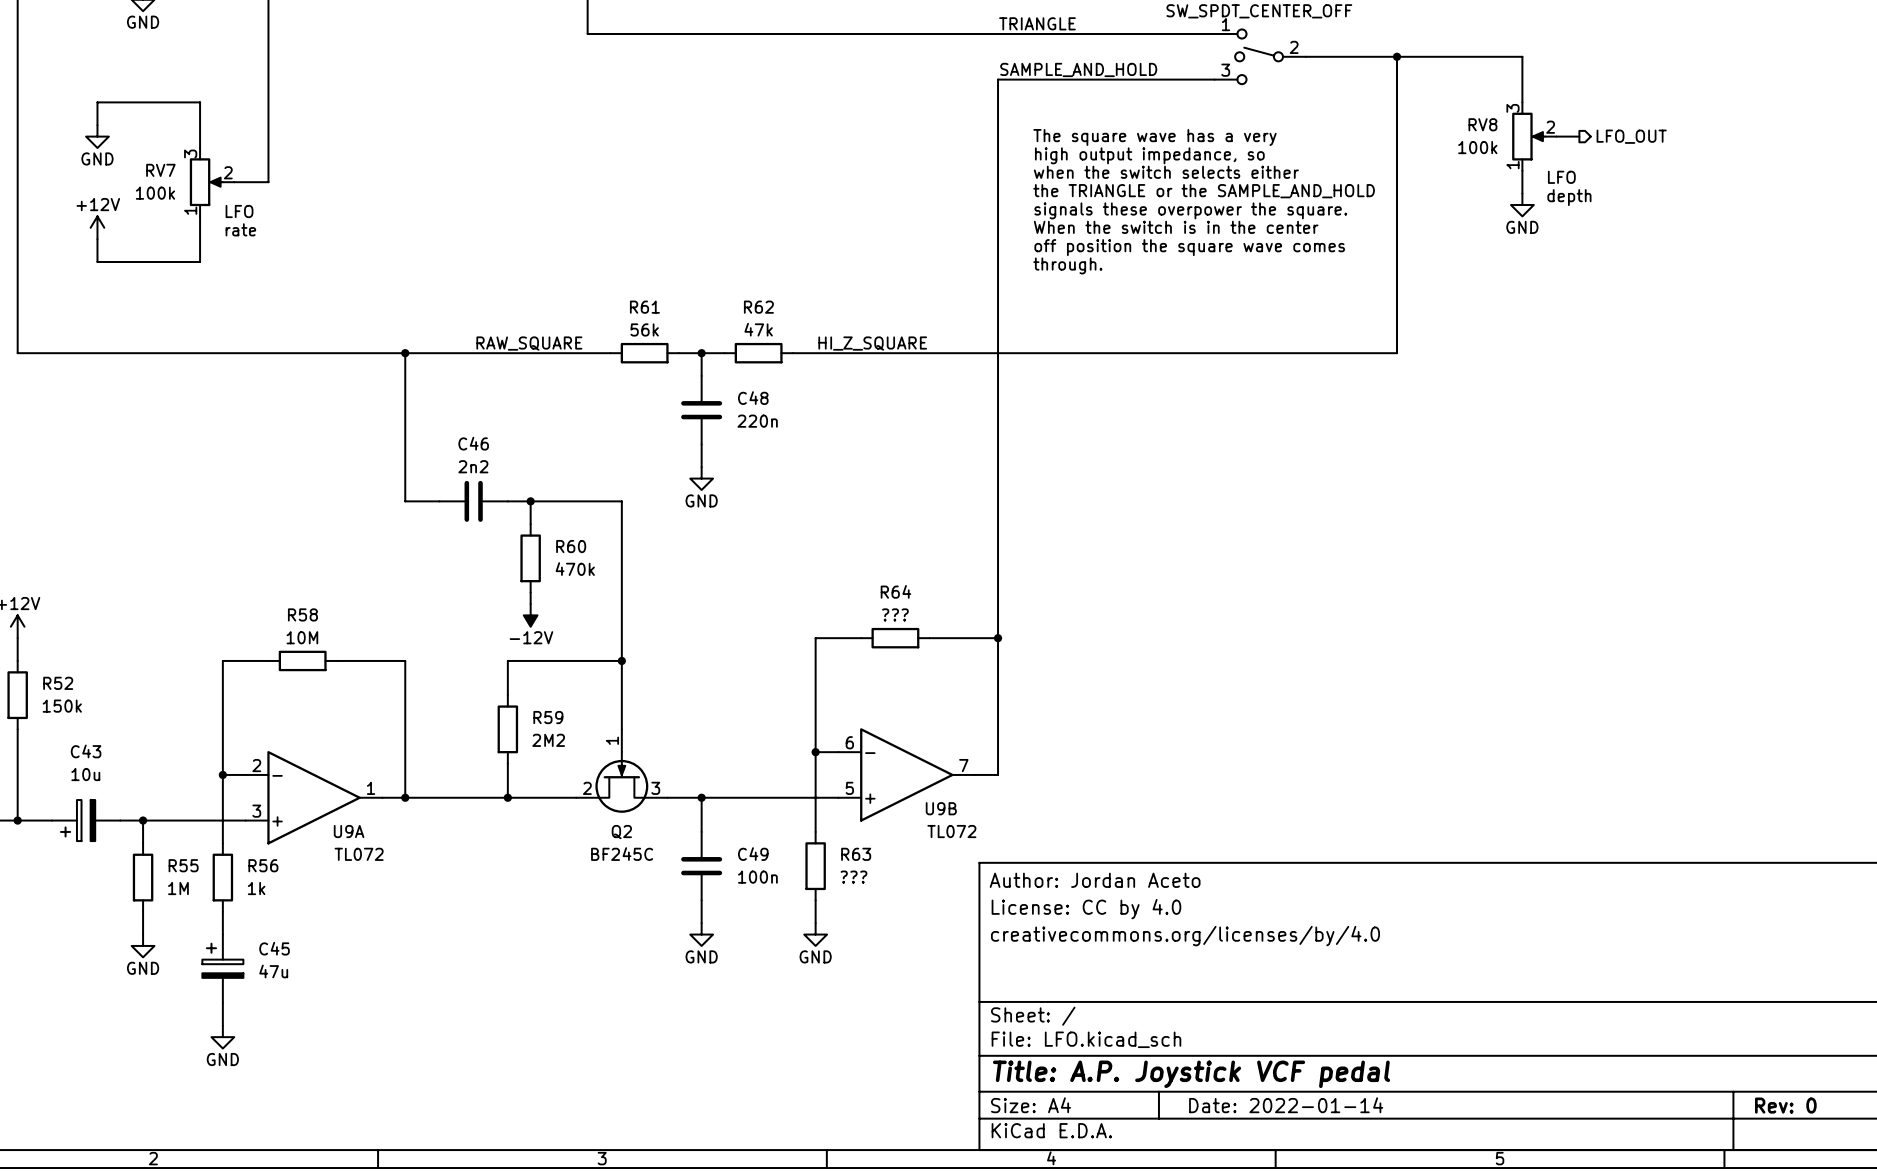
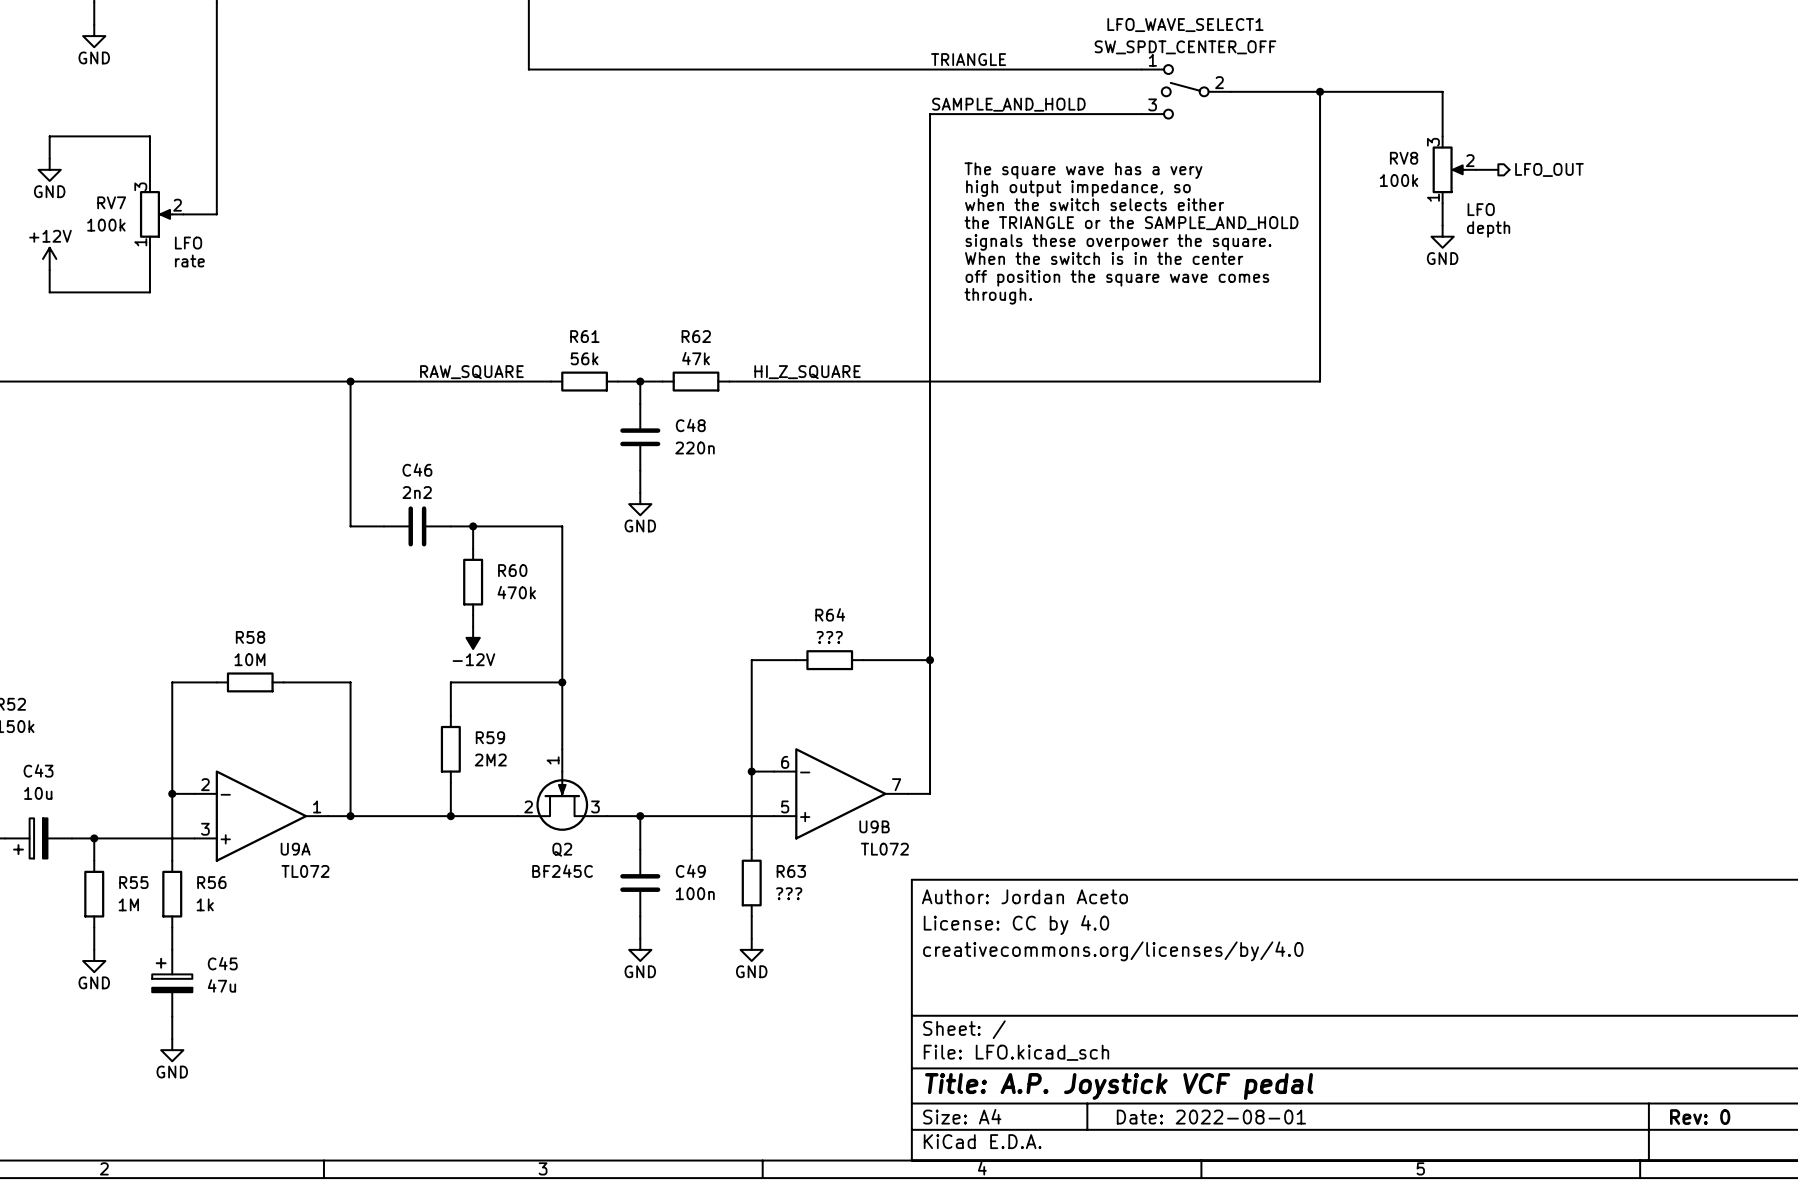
title block: Date: 2022-01-14 (1286, 1105) -> Date: 2022-08-01 (1211, 1117)

